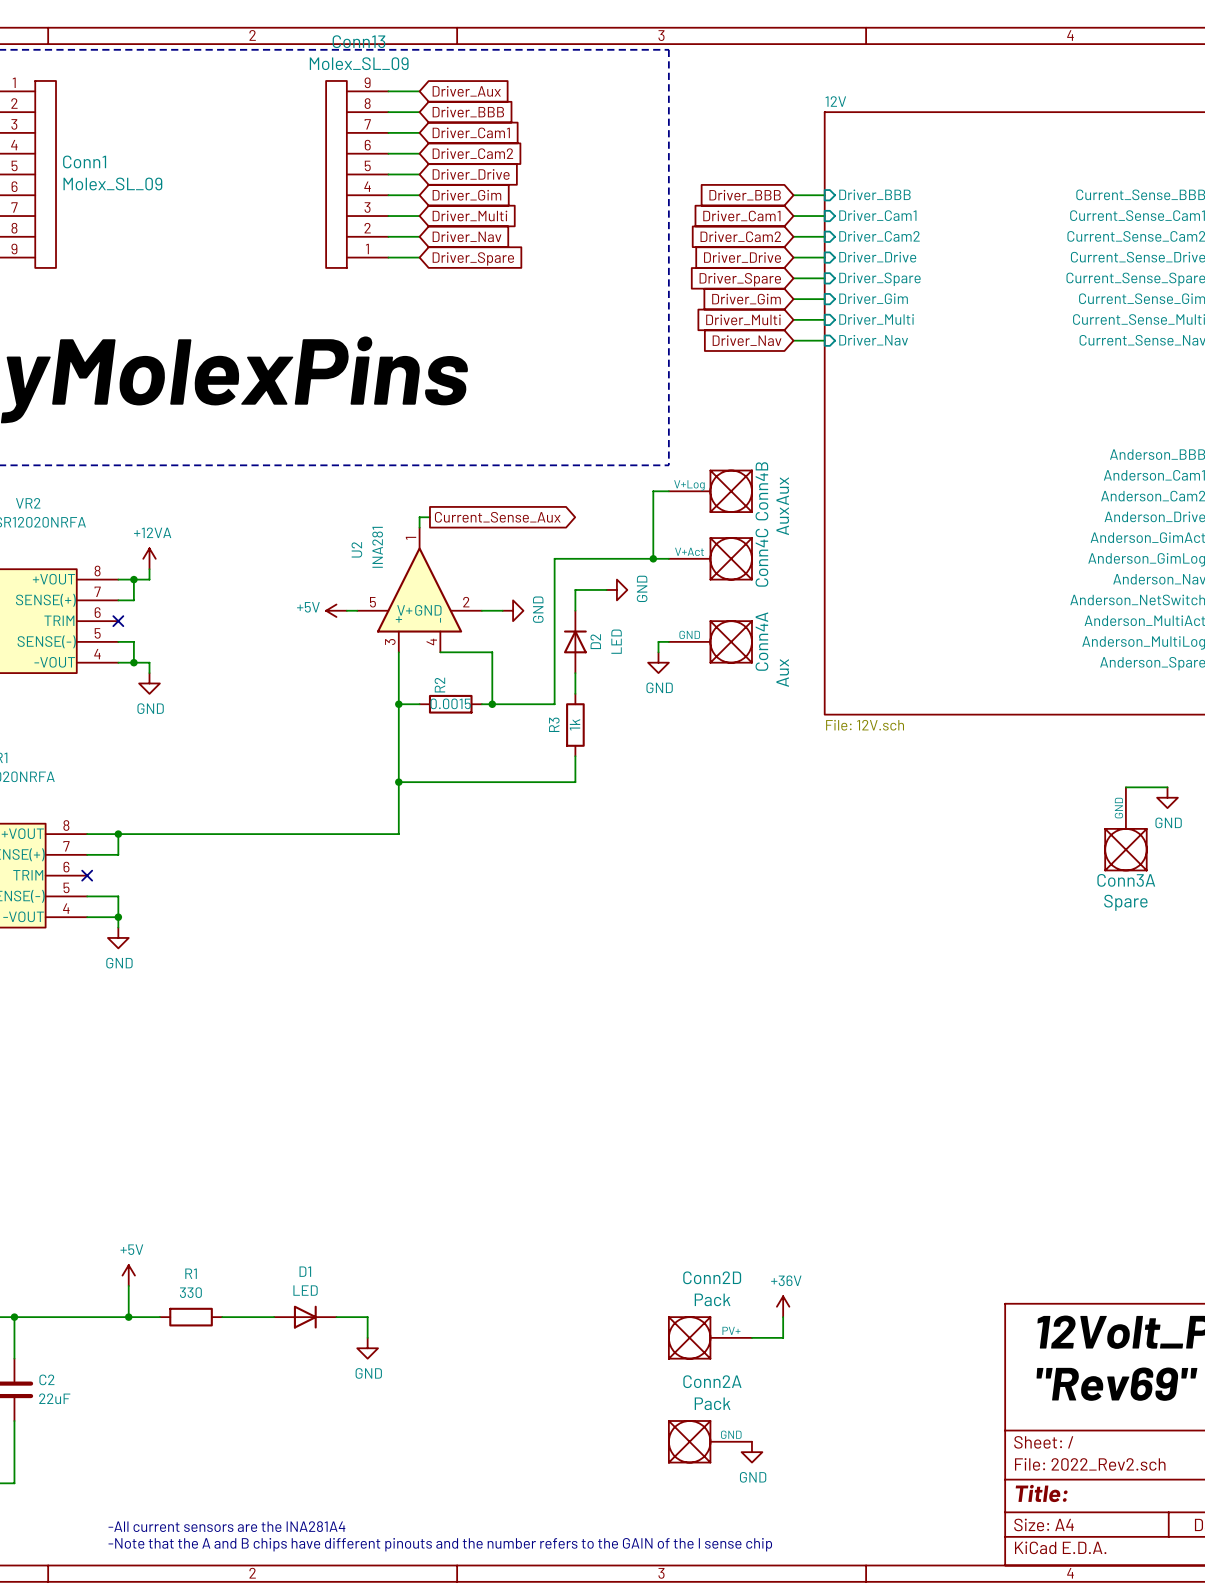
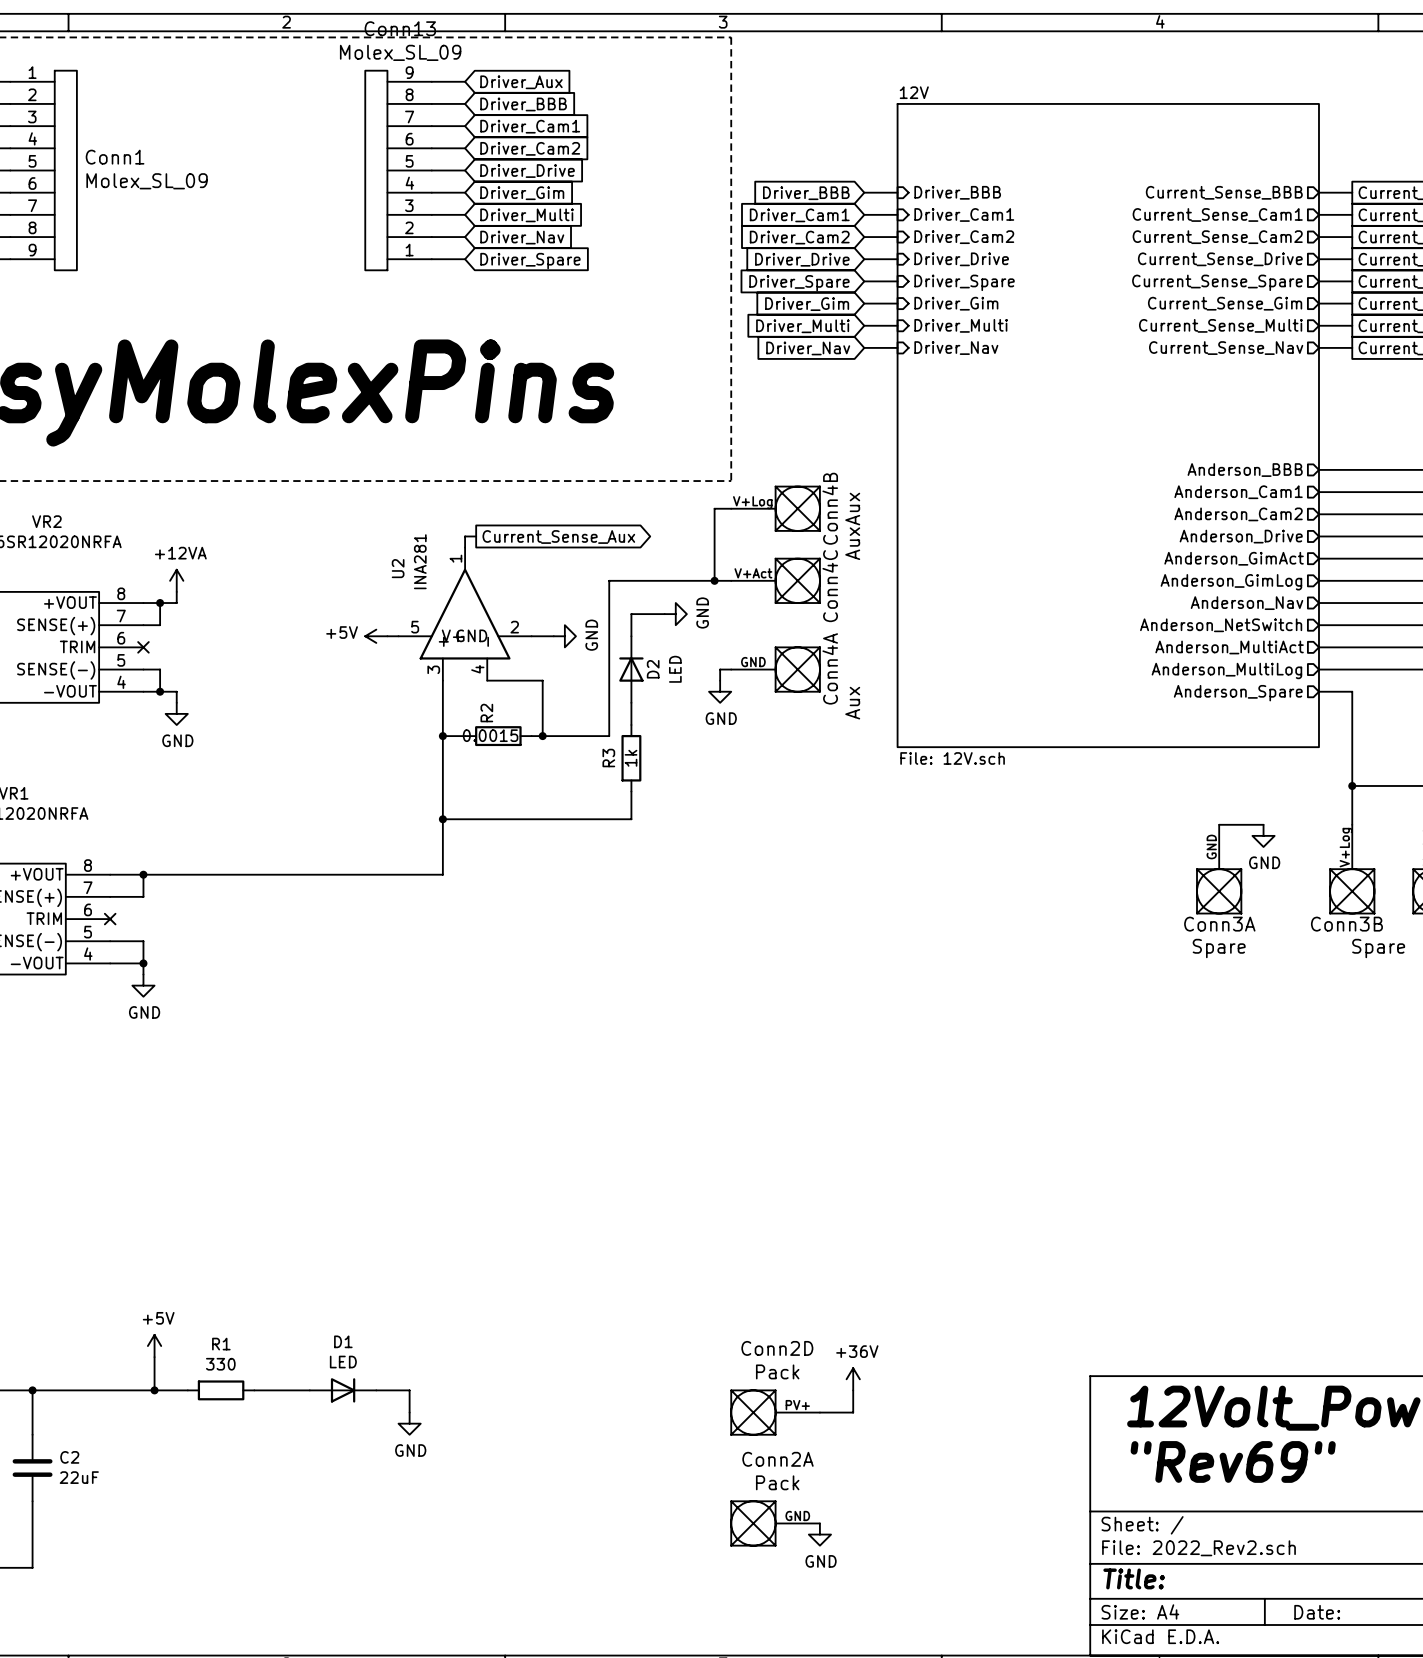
text: -All current sensors are the INA281A4 (226, 1526) -> none
text: -Note that the A and B chips have different pinouts and the number refers to the GAIN of the I sense chip (440, 1544) -> none

